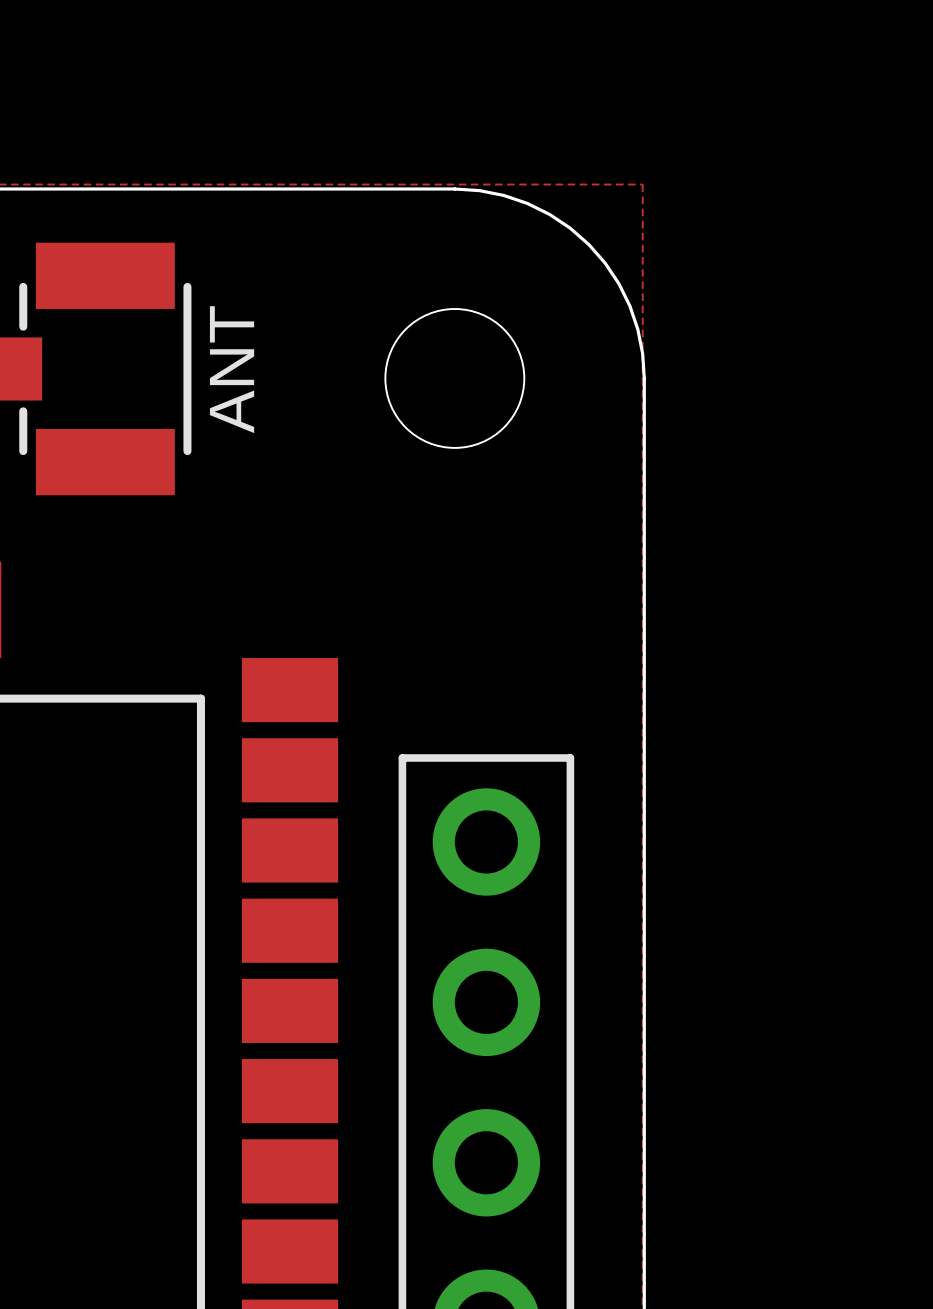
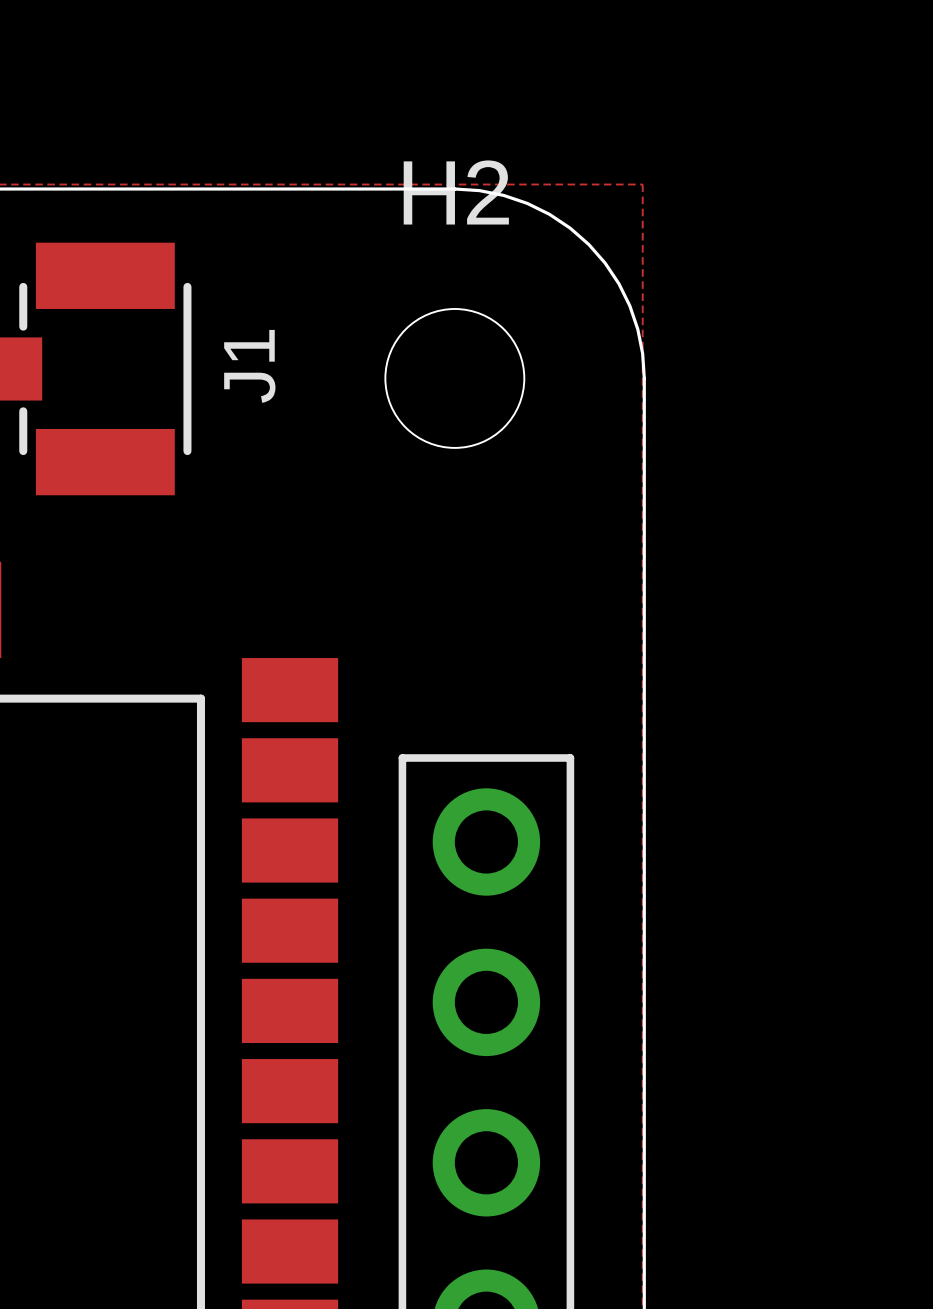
H2 name: none -> H2 (456, 192)
ANT name: ANT (232, 369) -> J1 (249, 366)

